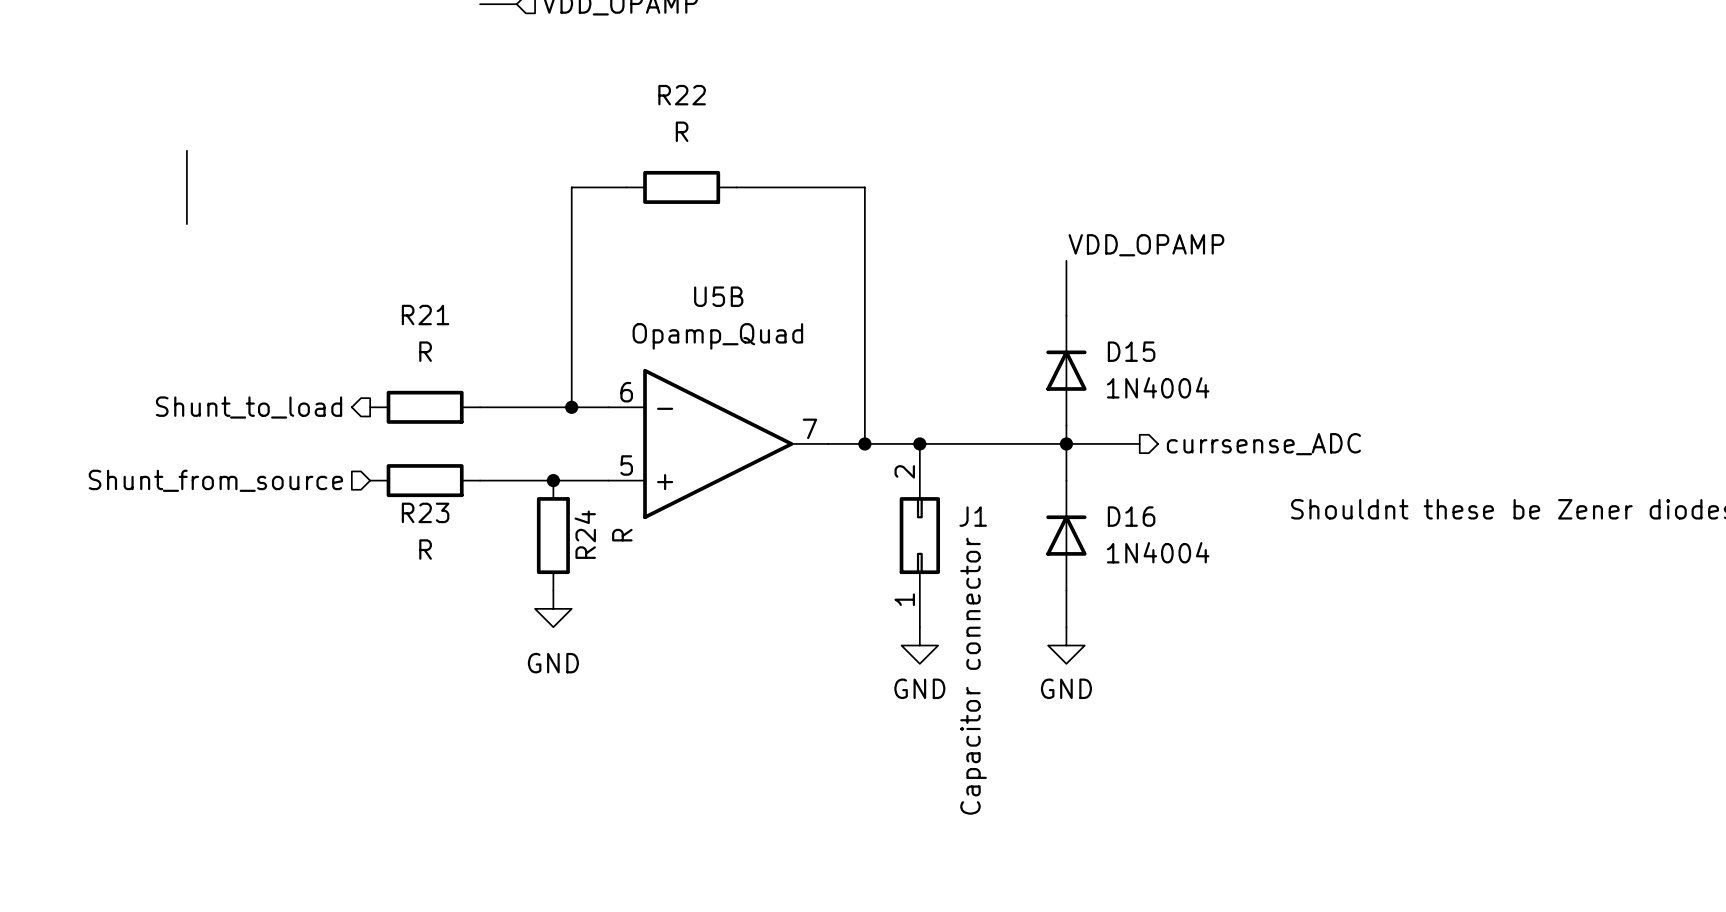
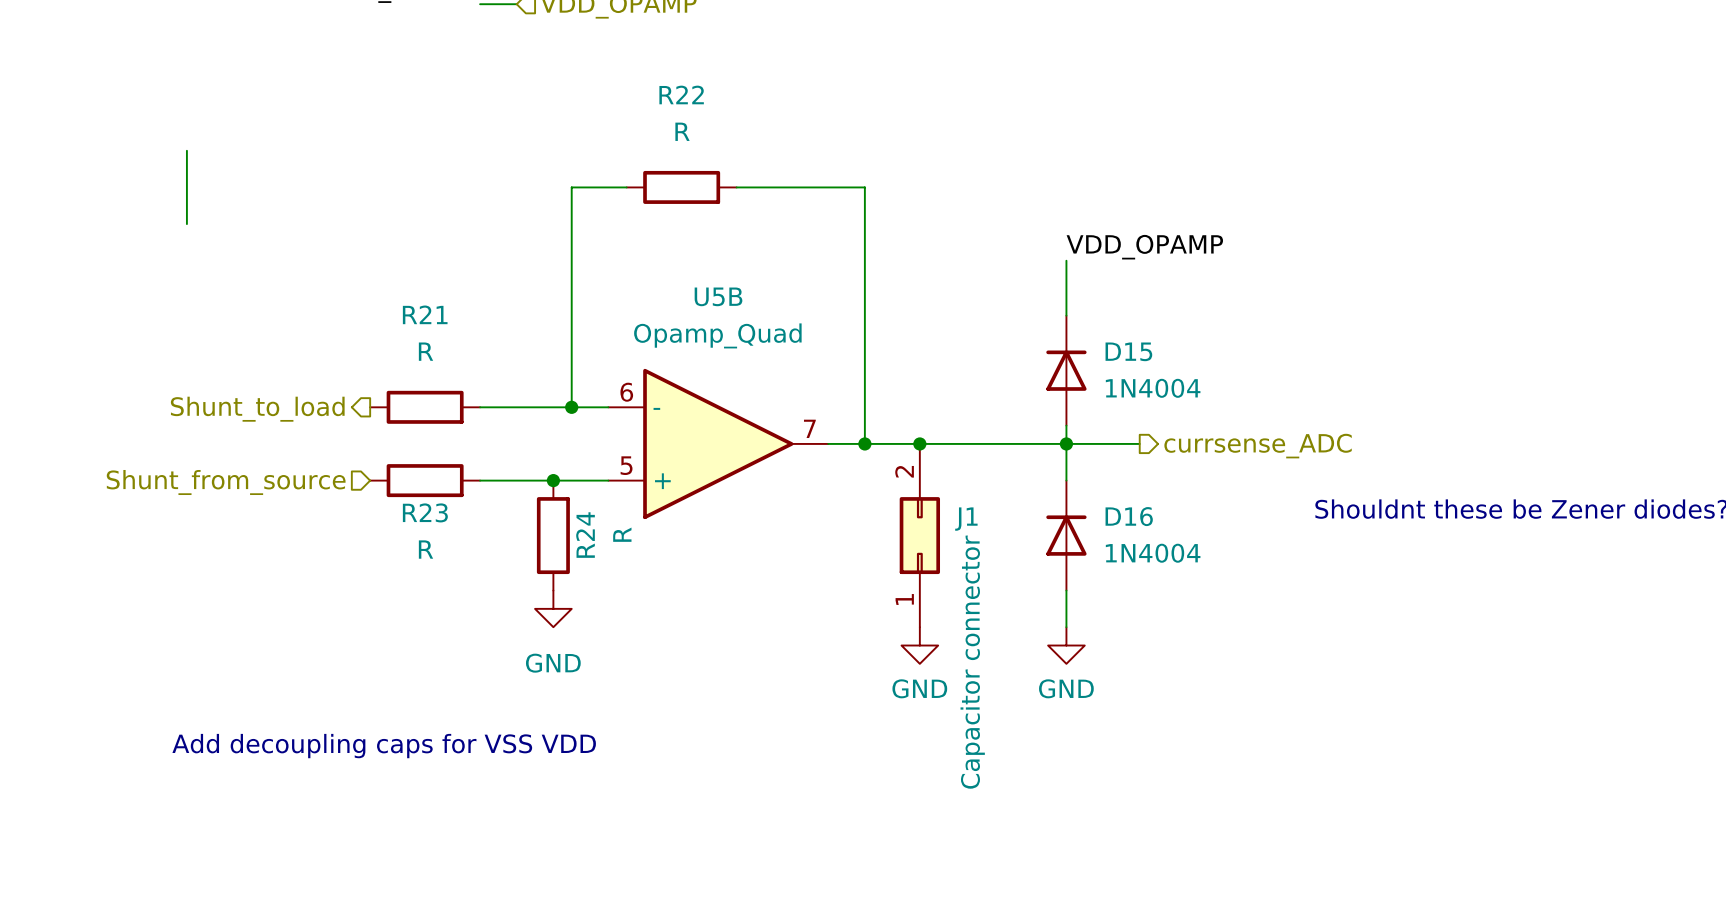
text: none -> Add decoupling caps for VSS VDD (384, 746)

